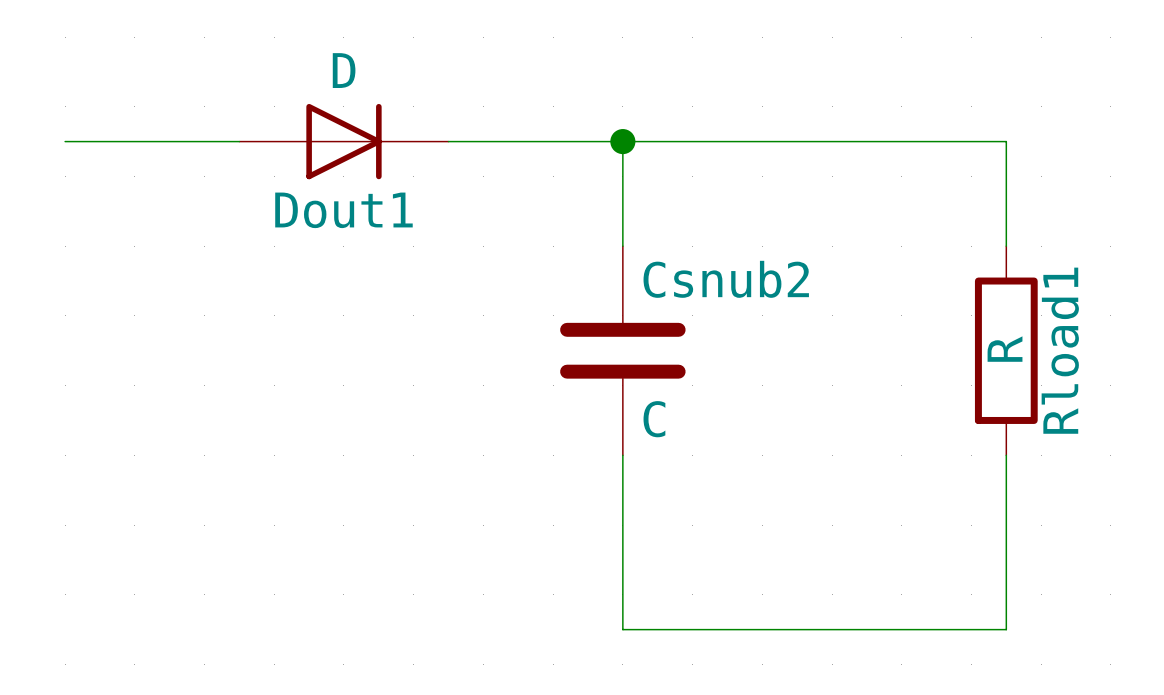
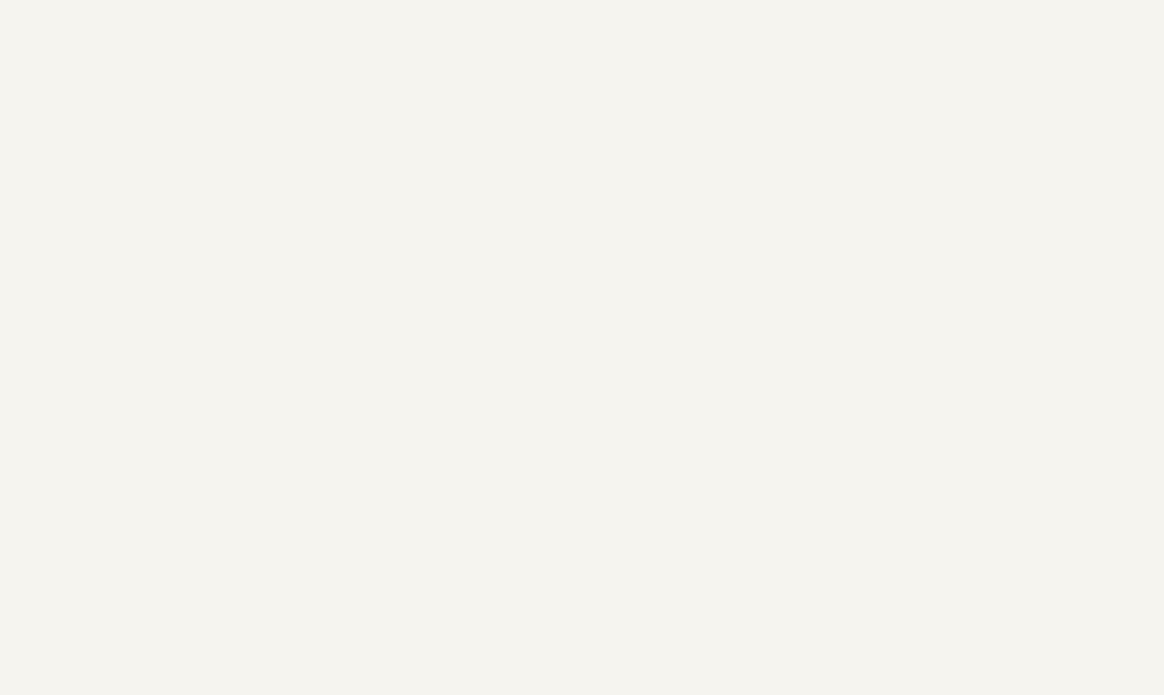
wire: (65, 141) (239, 141) -> none
Dout1: D (343, 141) -> none
wire: (448, 141) (1006, 141) (1006, 246) -> none
wire: (622, 141) (622, 246) -> none
junction: (622, 141) -> none
Csnub2: C (622, 350) -> none
Rload1: R (1006, 350) -> none
wire: (622, 455) (622, 629) (1006, 629) (1006, 455) -> none

